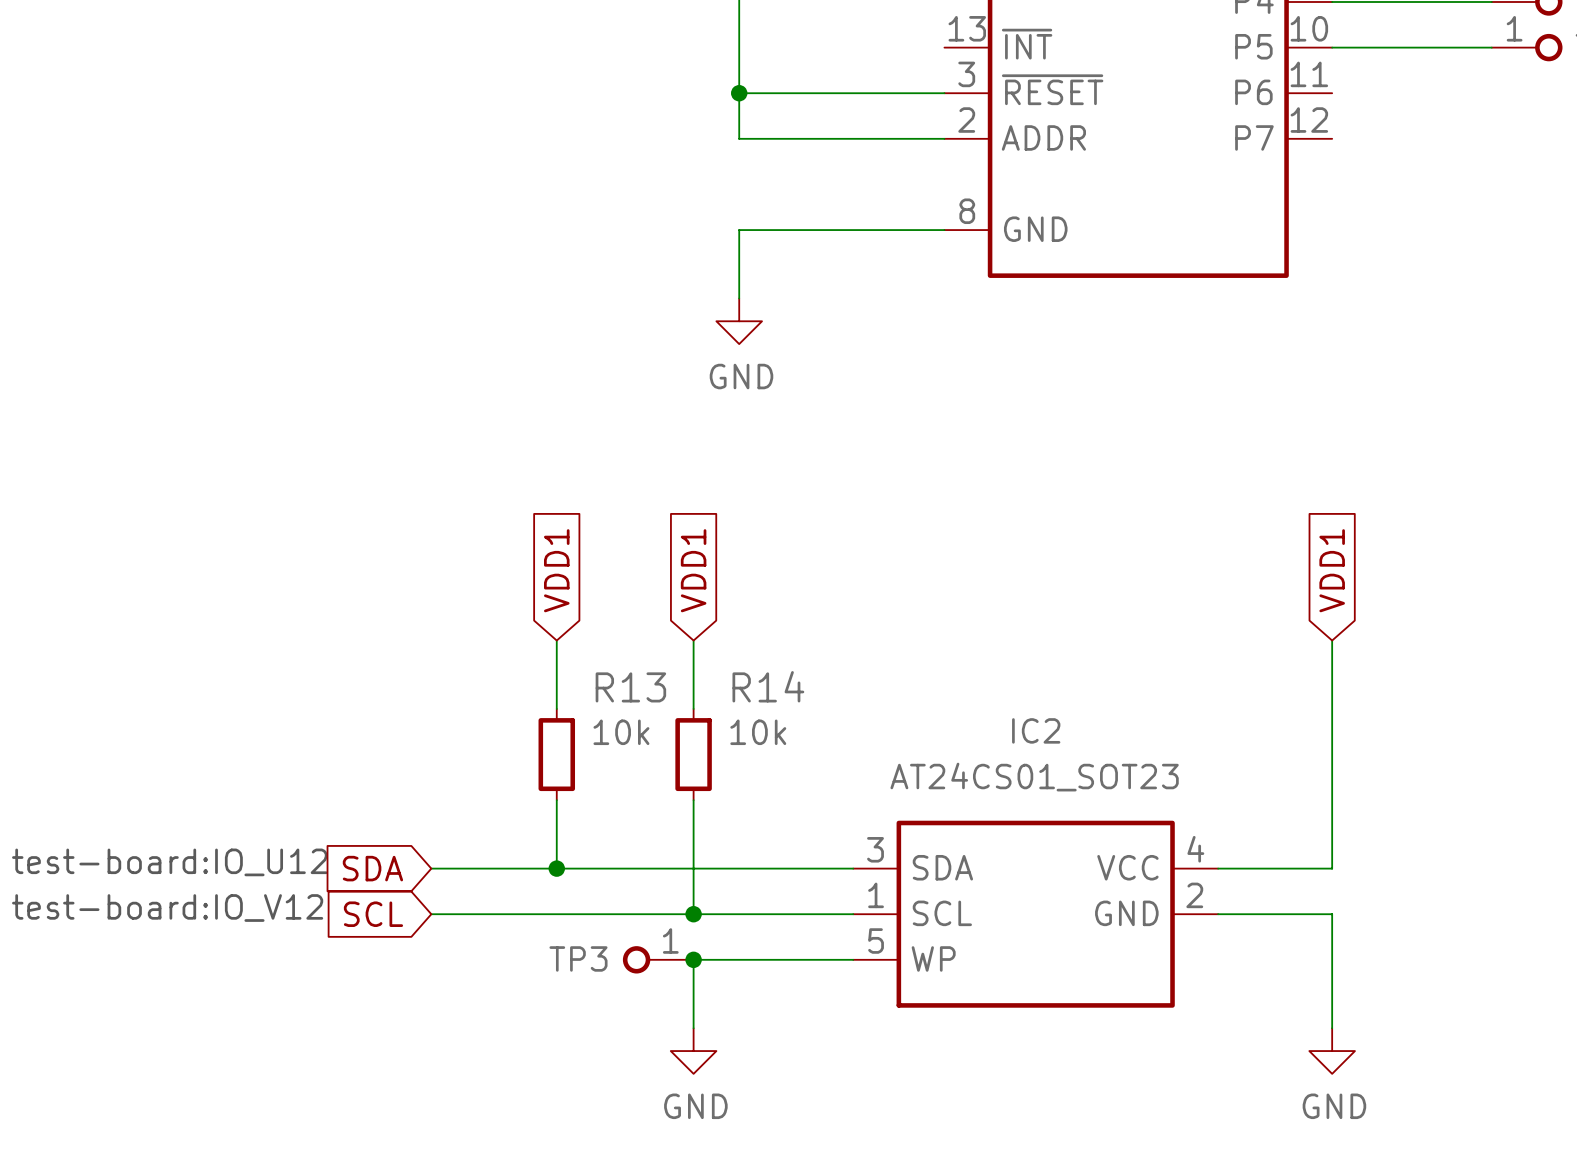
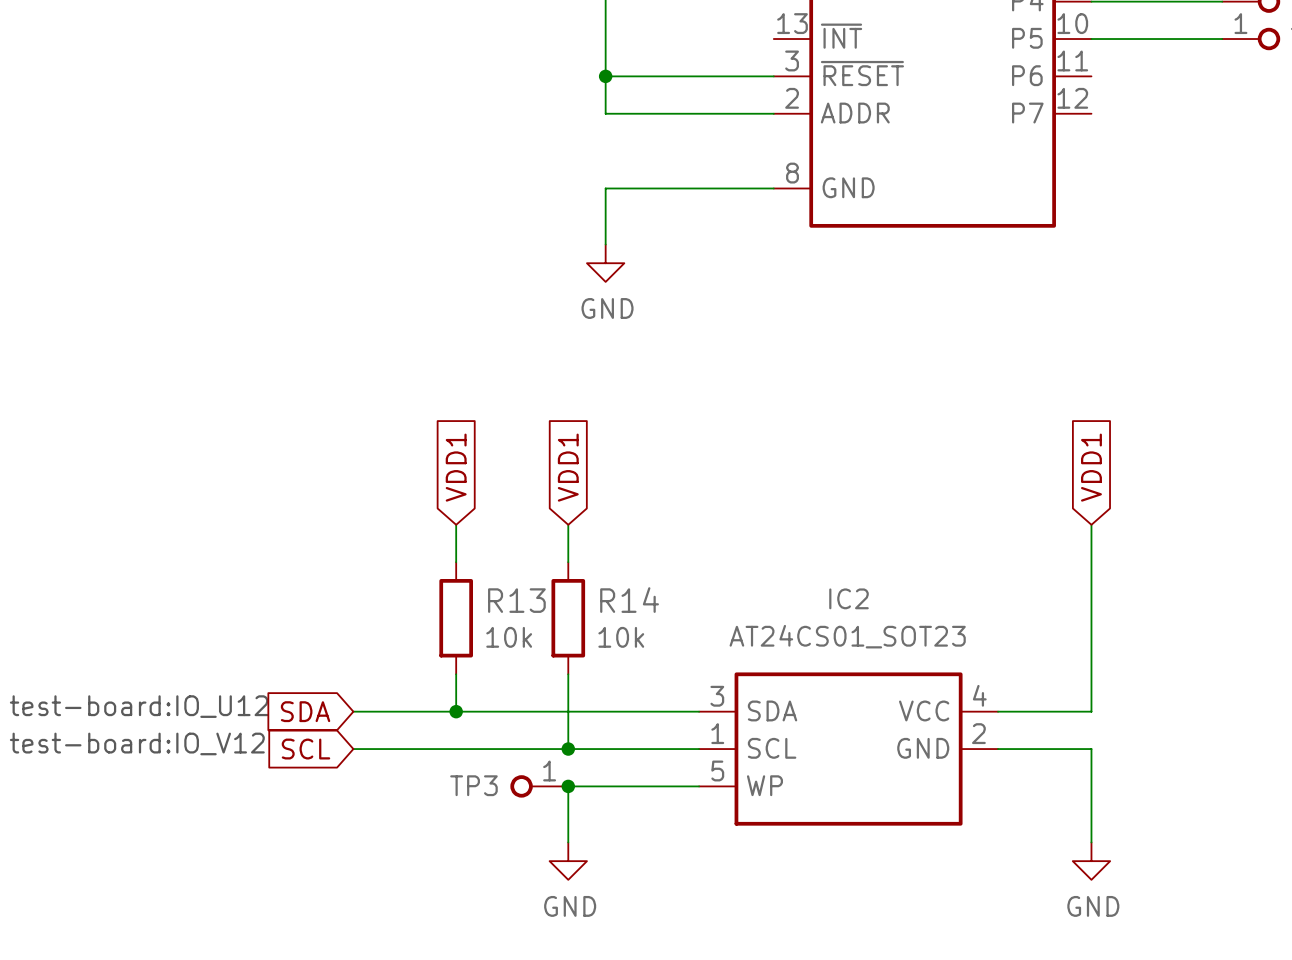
R14 name position: R14 (768, 686) -> R14 (629, 600)
R13 name position: R13 (630, 687) -> R13 (516, 600)
R13 symbol: [538, 708, 576, 801] -> [439, 562, 473, 675]
R14 symbol: [675, 708, 712, 801] -> [551, 562, 586, 675]
R13 text position: 10k (621, 732) -> 10k (509, 637)
R14 text position: 10k (758, 732) -> 10k (621, 637)

